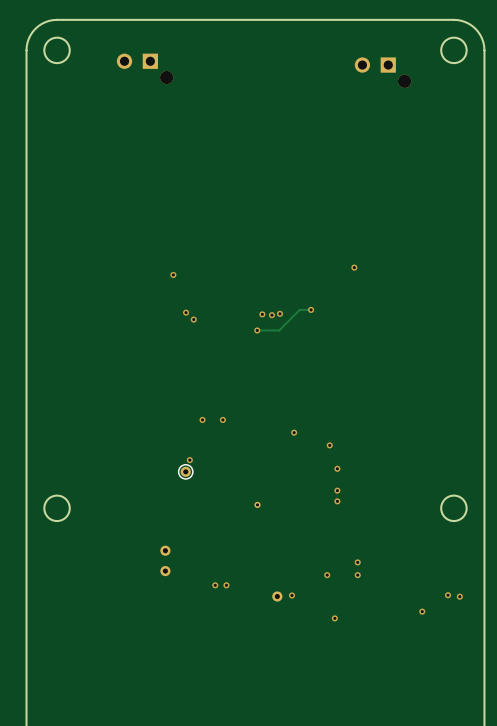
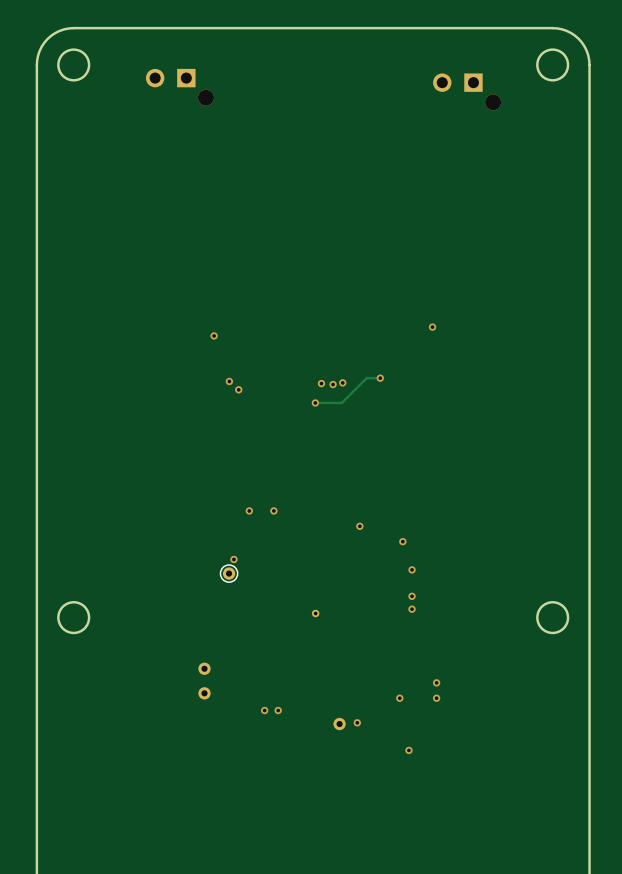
via: (448, 595) -> none
via: (459, 596) -> none
via: (422, 611) -> none

